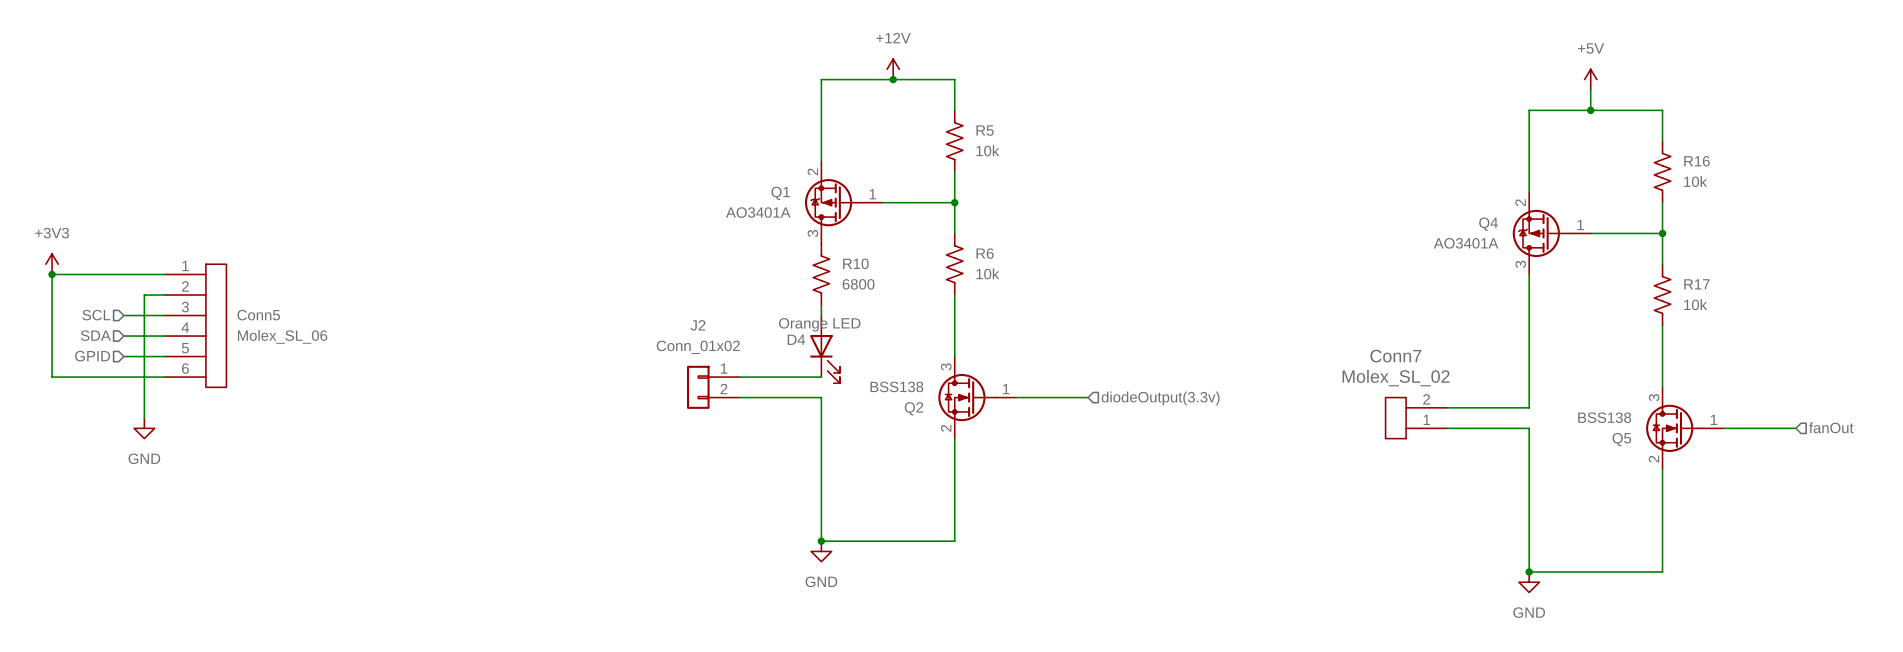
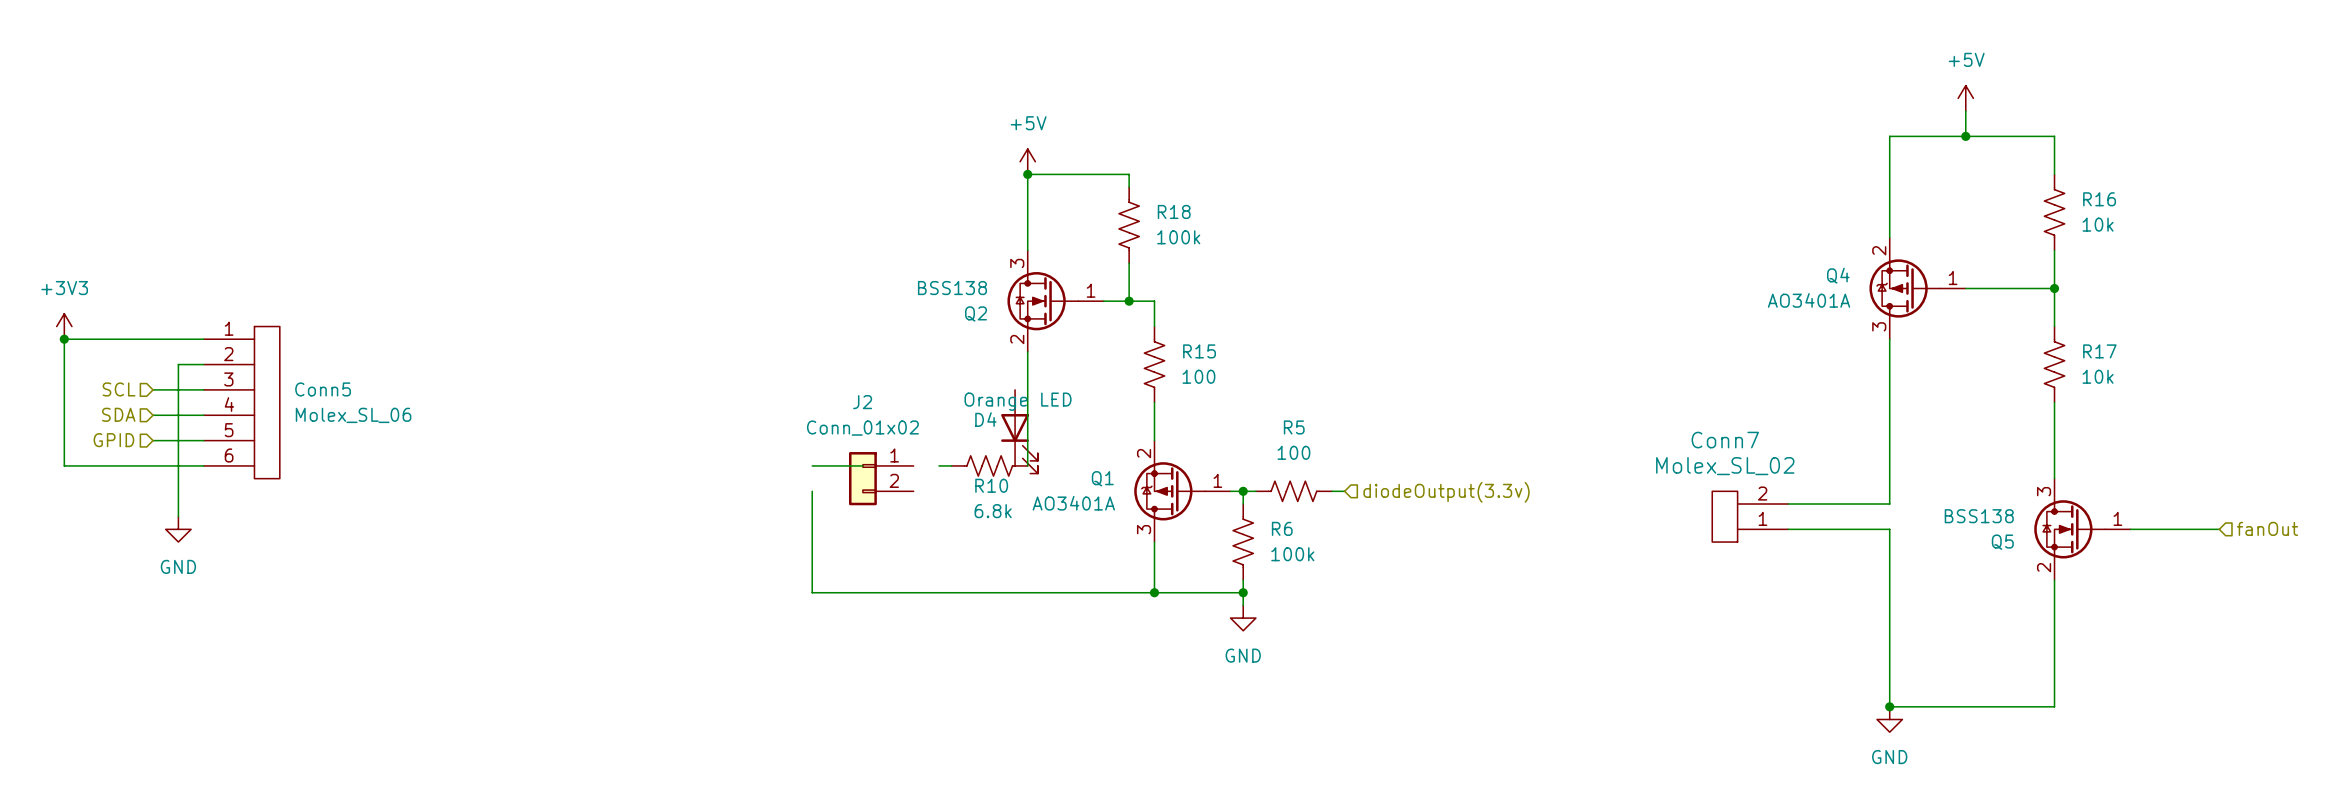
power symbol: +12V (893, 69) -> none
junction: (893, 79) -> none
wire: (954, 110) (954, 79) (821, 79) (821, 161) -> none
power symbol: none -> +5V (1027, 161)
R5 name position: R5 (985, 130) -> R5 (1294, 427)
junction: none -> (1027, 174)
R5 rotation: 0° (954, 141) -> 90° clockwise (1293, 491)
R5 position: (954, 141) -> (1293, 491)
R5 value: 10k (987, 150) -> 100 (1293, 452)
wire: none -> (1129, 187) (1129, 174) (1027, 174) (1027, 250)
wire: (954, 171) (954, 233) -> none
R18: none -> 100k (1129, 225)
Q1 position: (843, 202) -> (1182, 491)
wire: (882, 202) (954, 202) -> none
junction: (954, 202) -> none
wire: none -> (1129, 263) (1129, 301)
wire: none -> (1103, 301) (1154, 301) (1154, 326)
junction: none -> (1129, 301)
R10 name position: R10 (855, 263) -> R10 (991, 485)
R6 position: (954, 264) -> (1243, 542)
R6 value: 10k (987, 273) -> 100k (1292, 554)
R10 rotation: 0° (821, 274) -> 90° clockwise (989, 465)
R10 position: (821, 274) -> (989, 465)
wire: none -> (1027, 351) (1027, 465)
R10 value: 6800 (858, 284) -> 6.8k (993, 511)
R15: none -> 100 (1154, 364)
wire: (954, 295) (954, 356) -> none
wire: (821, 305) (821, 315) -> none
wire: none -> (1154, 402) (1154, 440)
wire: none -> (812, 465) (862, 465)
wire: (739, 377) (759, 377) -> none
wire: (770, 377) (821, 377) -> none
wire: none -> (812, 491) (812, 592) (1243, 592)
wire: (739, 397) (821, 397) (821, 541) (954, 541) (954, 438) -> none
Q2 position: (977, 397) -> (1055, 301)
wire: none -> (1243, 491) (1243, 504)
junction: none -> (1243, 491)
wire: none -> (1154, 542) (1154, 592)
wire: none -> (1243, 580) (1243, 605)
junction: none -> (1154, 592)
junction: none -> (1243, 592)
junction: (821, 541) -> none
power symbol position: GND (821, 551) -> GND (1243, 618)

